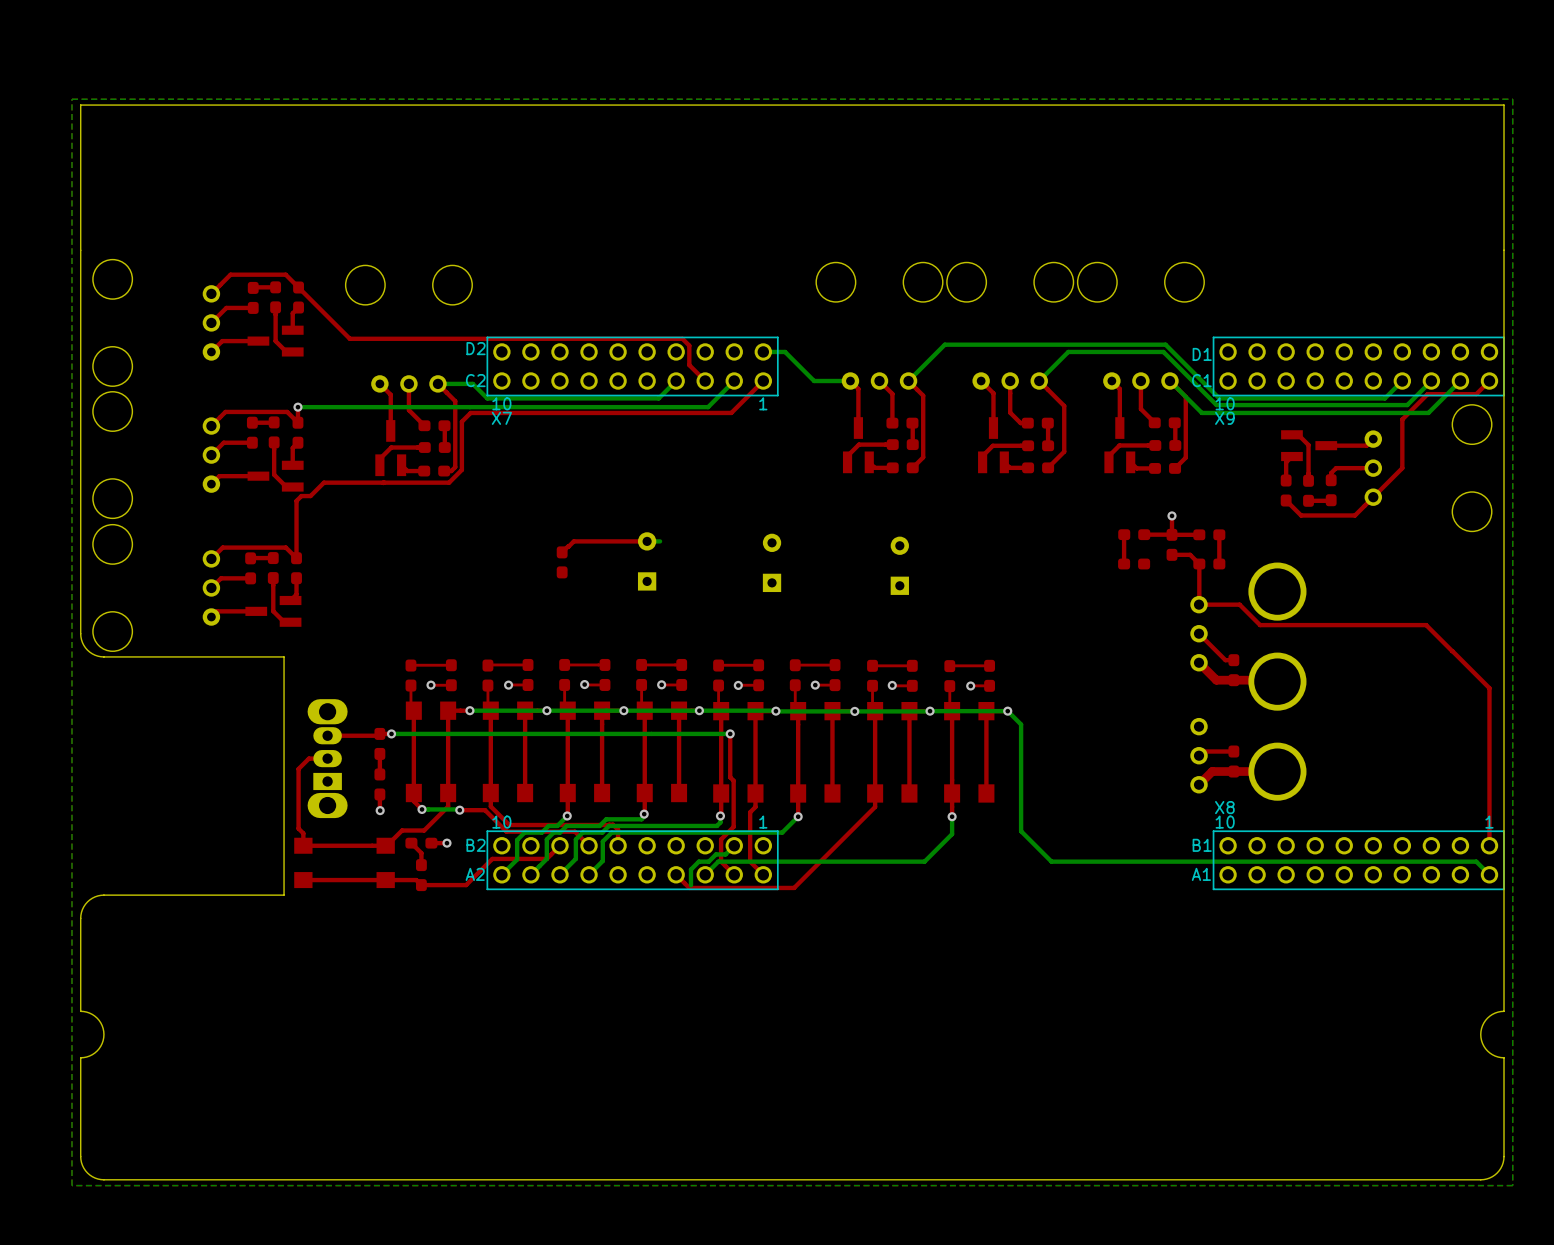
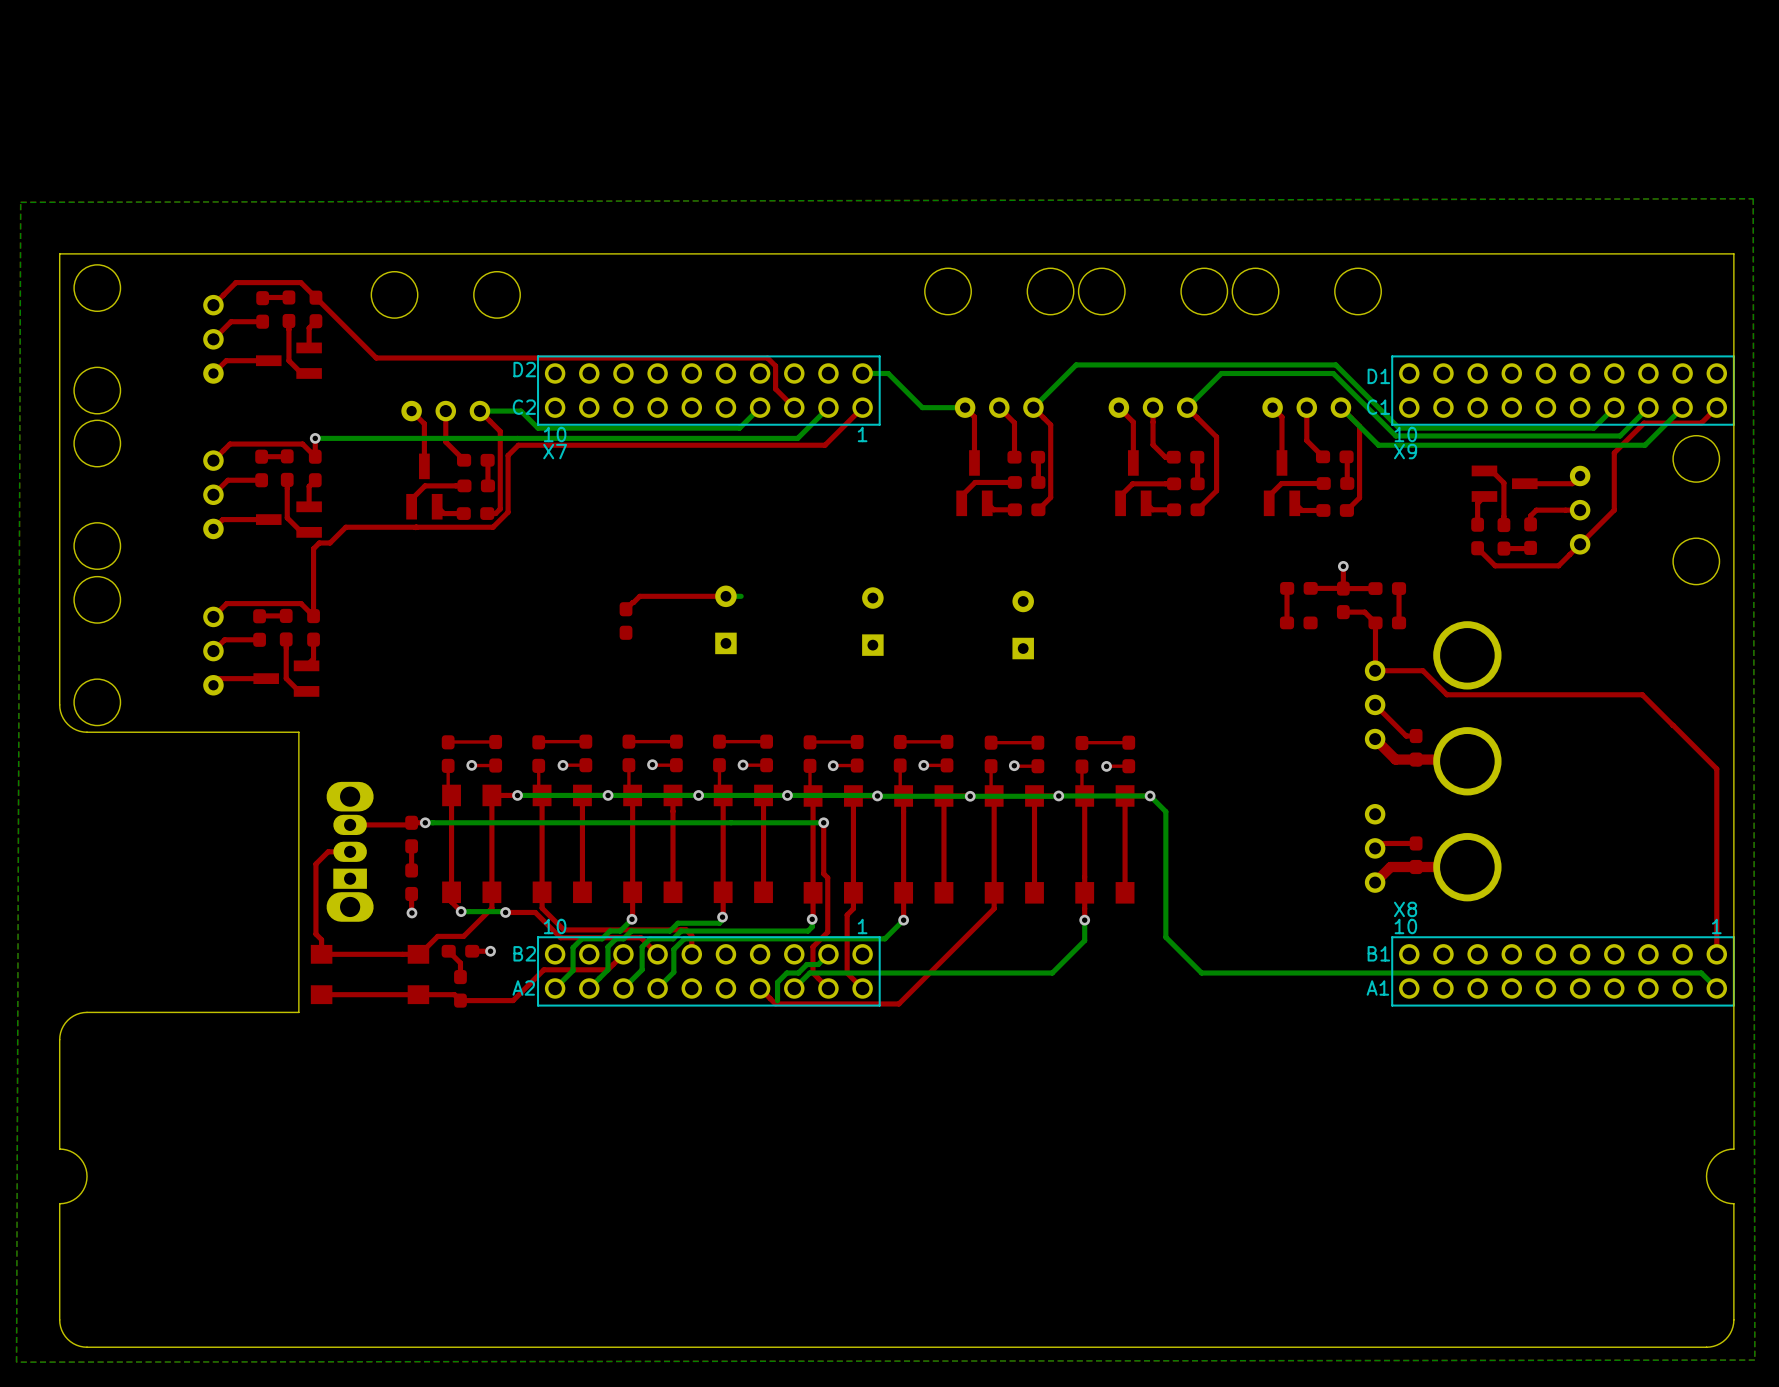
bottom zone outline: (1512, 99) (1512, 1185) (71, 1185) (71, 99) (1512, 99) -> (1753, 198) (1754, 1360) (16, 1362) (20, 202) (1753, 198)
board edge: (1504, 250) (1504, 105) (80, 105) (80, 250) -> (1733, 253) (59, 253)

